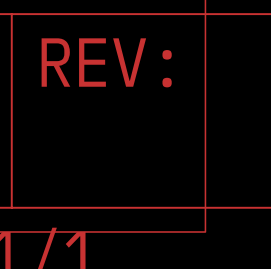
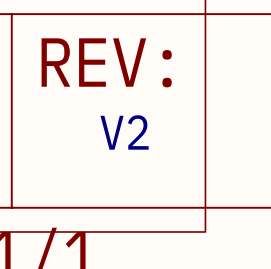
text: none -> V2 (124, 132)

